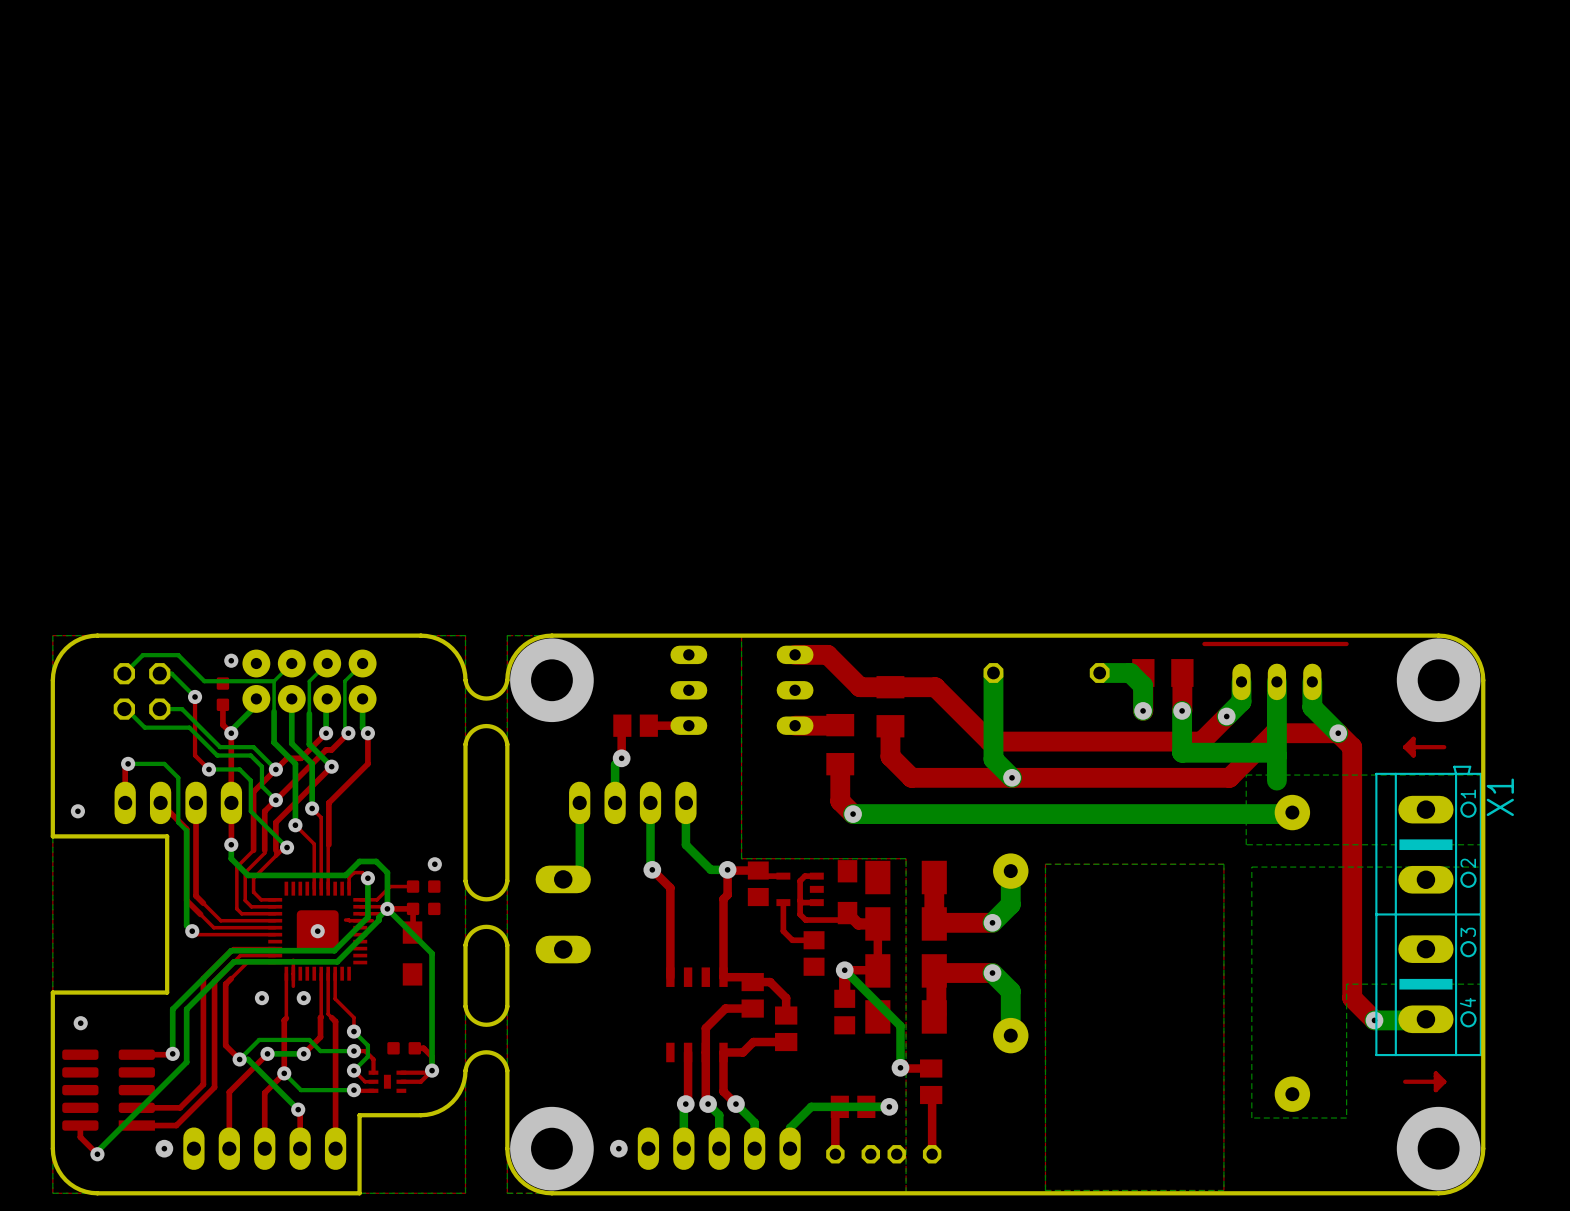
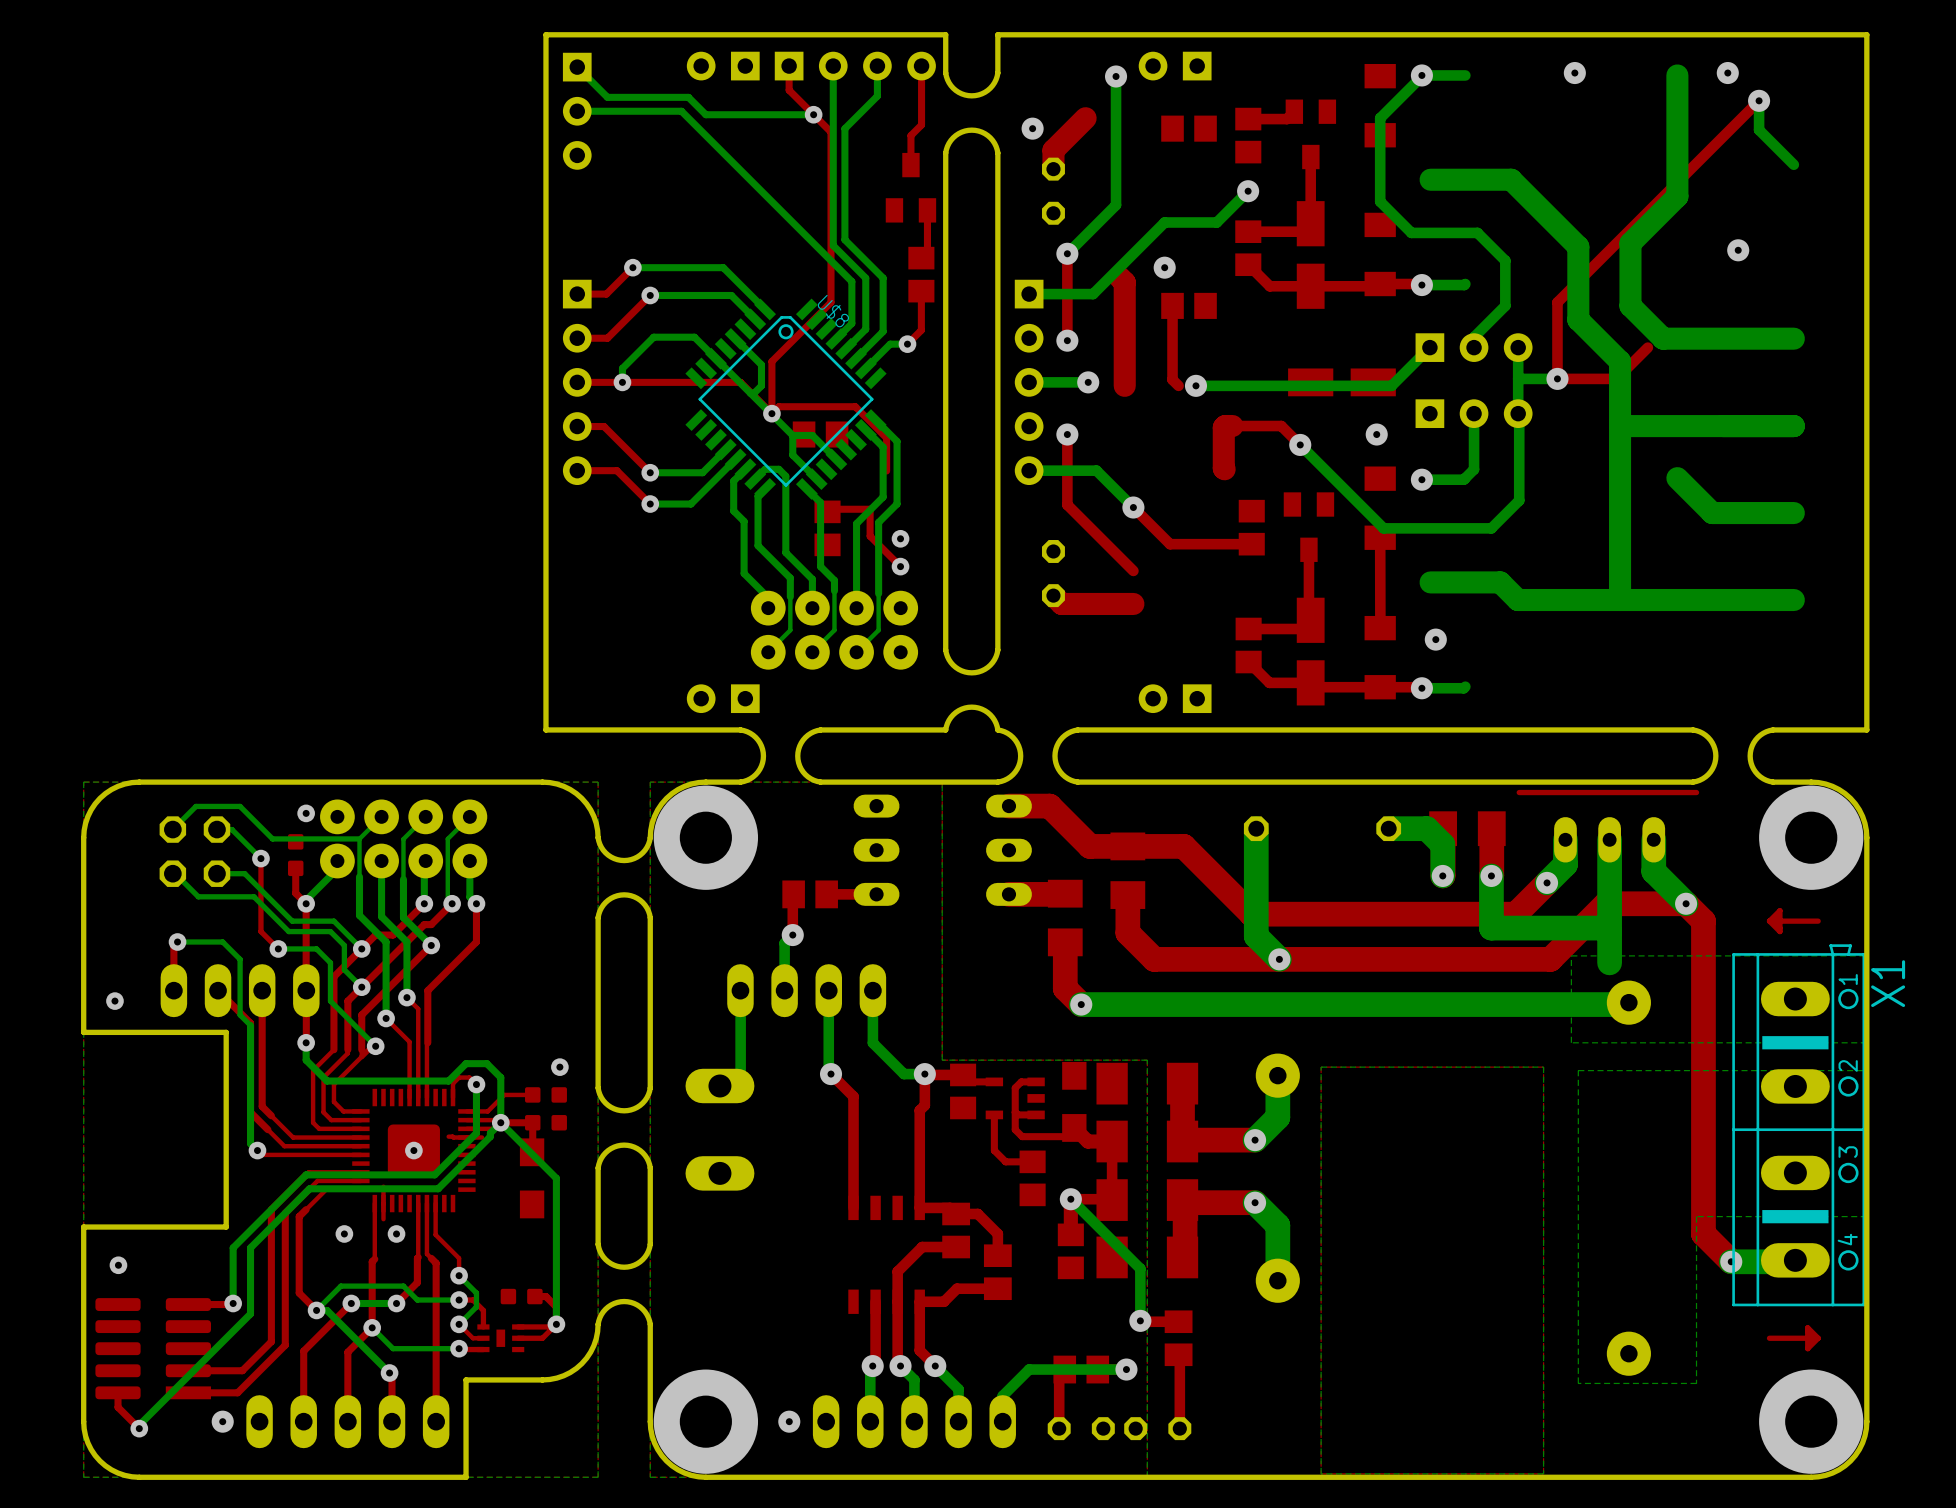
part: none -> (723, 66)
top track: none -> (789, 66) (789, 90) (831, 132) (831, 302) (771, 361) (771, 413)
bottom track: none -> (833, 66) (833, 245) (865, 278) (865, 329) (846, 348)
part: none -> (855, 66)
bottom track: none -> (877, 66) (877, 96) (844, 128) (844, 239) (883, 278) (883, 331) (856, 358)
top track: none -> (921, 66) (921, 124) (910, 135) (910, 165)
part: none -> (1175, 66)
bottom track: none -> (577, 67) (607, 97) (688, 97) (705, 114) (813, 114)
via: none -> (1574, 73)
via: none -> (1727, 73)
via: none -> (1421, 75)
bottom track: none -> (1422, 75) (1380, 118) (1380, 201) (1411, 232) (1477, 232) (1505, 260) (1505, 305) (1474, 337) (1474, 347)
bottom track: none -> (1465, 75) (1421, 75)
bottom track: none -> (1677, 75) (1677, 196) (1630, 243) (1630, 305) (1663, 338) (1793, 338)
bottom track: none -> (1116, 76) (1116, 205) (1067, 253)
via: none -> (1116, 76)
bottom track: none -> (1759, 100) (1759, 129) (1793, 164)
top track: none -> (1759, 100) (1557, 302) (1557, 378) (1616, 378) (1647, 347)
via: none -> (1759, 100)
part: none -> (1380, 105)
bottom track: none -> (577, 111) (681, 111) (851, 281) (851, 323) (836, 338)
part: none -> (577, 111)
top track: none -> (1294, 111) (1286, 119) (1248, 119)
via: none -> (813, 114)
top track: none -> (1085, 118) (1053, 150) (1053, 169)
via: none -> (1032, 128)
part: none -> (1189, 128)
part: none -> (1248, 135)
part: none -> (1310, 134)
board edge: none -> (997, 152) (997, 650) (994, 659) (987, 667) (971, 672) (955, 667) (949, 659) (945, 650) (945, 152) (949, 143) (955, 135) (971, 130) (987, 135) (994, 143) (997, 152)
top track: none -> (1310, 157) (1310, 223) (1302, 231) (1248, 231)
bottom track: none -> (1430, 179) (1511, 179) (1578, 246) (1578, 319) (1620, 361) (1620, 600)
part: none -> (910, 187)
part: none -> (1053, 191)
bottom track: none -> (1248, 191) (1216, 222) (1164, 222) (1093, 294) (1029, 294)
via: none -> (1248, 191)
top track: none -> (927, 210) (927, 252) (921, 258)
part: none -> (1248, 248)
via: none -> (1738, 250)
top track: none -> (1067, 253) (1067, 340)
via: none -> (1067, 253)
part: none -> (1310, 254)
part: none -> (1380, 254)
top track: none -> (1248, 264) (1269, 286) (1421, 285)
bottom track: none -> (632, 267) (723, 267) (765, 309)
top track: none -> (632, 267) (606, 294) (577, 294)
via: none -> (632, 267)
via: none -> (1164, 267)
part: none -> (921, 274)
top track: none -> (1119, 277) (1124, 282) (1124, 385)
via: none -> (1421, 285)
bottom track: none -> (1465, 284) (1421, 285)
top track: none -> (921, 291) (921, 330) (907, 344)
bottom track: none -> (650, 295) (731, 295) (755, 319)
top track: none -> (650, 295) (607, 338) (577, 338)
via: none -> (650, 295)
top track: none -> (1172, 305) (1172, 379) (1178, 385)
part: none -> (1189, 305)
bottom track: none -> (735, 338) (761, 364) (761, 385) (754, 393) (750, 393)
via: none -> (1067, 340)
bottom track: none -> (907, 344) (890, 344) (865, 368)
via: none -> (907, 344)
bottom track: none -> (1429, 347) (1391, 385) (1195, 385)
part: none -> (1474, 347)
bottom track: none -> (1518, 347) (1519, 500) (1491, 528) (1383, 528) (1300, 444)
bottom track: none -> (1557, 378) (1518, 378)
via: none -> (1557, 378)
top track: none -> (577, 382) (740, 382) (771, 413)
part: none -> (577, 382)
bottom track: none -> (622, 382) (622, 368) (653, 337) (694, 337) (792, 435)
via: none -> (622, 382)
part: none -> (1029, 382)
bottom track: none -> (1088, 382) (1029, 382)
via: none -> (1088, 382)
part: none -> (1341, 382)
via: none -> (1195, 385)
U$8: none -> (786, 399)
top track: none -> (771, 413) (778, 406) (855, 406) (886, 437) (886, 471)
via: none -> (771, 413)
bottom track: none -> (1474, 413) (1474, 469) (1463, 479) (1421, 479)
part: none -> (1474, 413)
bottom track: none -> (875, 420) (897, 441) (897, 504) (878, 522) (878, 630) (856, 652)
bottom track: none -> (1620, 424) (1622, 426) (1793, 426)
top track: none -> (577, 426) (604, 426) (650, 472)
bottom track: none -> (865, 429) (883, 447) (883, 497) (856, 523) (856, 608)
part: none -> (820, 434)
top track: none -> (1067, 434) (1067, 504) (1133, 570)
via: none -> (1067, 434)
via: none -> (1376, 434)
bottom track: none -> (792, 435) (792, 455) (816, 479)
bottom track: none -> (792, 435) (812, 435) (836, 459)
top track: none -> (1300, 444) (1281, 426) (1225, 426) (1223, 427) (1224, 469)
via: none -> (1300, 444)
bottom track: none -> (725, 449) (702, 472) (650, 472)
bottom track: none -> (735, 459) (690, 504) (650, 504)
bottom track: none -> (745, 469) (733, 481) (733, 510) (744, 521) (744, 573) (768, 597) (768, 608)
top track: none -> (577, 470) (616, 470) (650, 504)
bottom track: none -> (1029, 470) (1096, 470) (1133, 507)
via: none -> (650, 472)
bottom track: none -> (1677, 478) (1712, 513) (1793, 513)
bottom track: none -> (755, 479) (765, 469) (778, 469) (785, 476) (785, 552) (812, 579) (812, 608)
via: none -> (1421, 479)
bottom track: none -> (765, 488) (758, 496) (758, 545) (790, 578) (790, 630) (768, 652)
bottom track: none -> (806, 488) (820, 502) (820, 566) (834, 580) (834, 630) (812, 652)
via: none -> (650, 504)
top track: none -> (1133, 507) (1170, 544) (1251, 544)
via: none -> (1133, 507)
part: none -> (1380, 508)
top track: none -> (827, 511) (830, 509) (870, 509) (870, 536) (900, 566)
part: none -> (1251, 527)
part: none -> (1308, 527)
part: none -> (827, 528)
top track: none -> (1380, 537) (1380, 628)
via: none -> (900, 538)
top track: none -> (1308, 549) (1308, 619) (1310, 620) (1301, 628) (1248, 628)
via: none -> (900, 566)
part: none -> (1053, 573)
bottom track: none -> (1430, 582) (1500, 582) (1517, 600) (1793, 600)
top track: none -> (1053, 595) (1061, 603) (1133, 603)
part: none -> (834, 630)
via: none -> (1435, 639)
part: none -> (1248, 645)
part: none -> (1310, 651)
part: none -> (1380, 657)
top track: none -> (1248, 662) (1269, 682) (1310, 682) (1314, 687) (1421, 688)
bottom track: none -> (1465, 686) (1463, 688) (1421, 688)
via: none -> (1421, 688)
part: none -> (723, 698)
part: none -> (1175, 698)
board edge: (643, 635) (579, 635) -> (820, 782) (805, 774) (797, 759) (801, 742) (810, 733) (820, 729) (945, 729) (949, 720) (955, 712) (971, 707) (987, 712) (994, 720) (997, 729) (1010, 735) (1018, 745) (1020, 759) (1017, 769) (1010, 776) (997, 782)
board edge: (850, 635) (786, 635) -> none
board edge: (1407, 635) (1343, 635) -> (1077, 782) (1068, 778) (1060, 772) (1054, 756) (1060, 740) (1068, 733) (1077, 729) (1693, 729) (1702, 733) (1710, 740) (1715, 756) (1710, 772) (1702, 778) (1693, 782)
board edge: none -> (1772, 782) (1757, 774) (1750, 759) (1753, 742) (1763, 733) (1772, 729) (1866, 729) (1866, 34) (997, 34) (997, 73) (996, 79) (987, 90) (971, 95) (955, 90) (947, 79) (945, 73) (945, 34) (545, 34) (545, 729) (744, 730) (758, 740) (762, 749) (763, 759) (755, 774) (740, 782)

